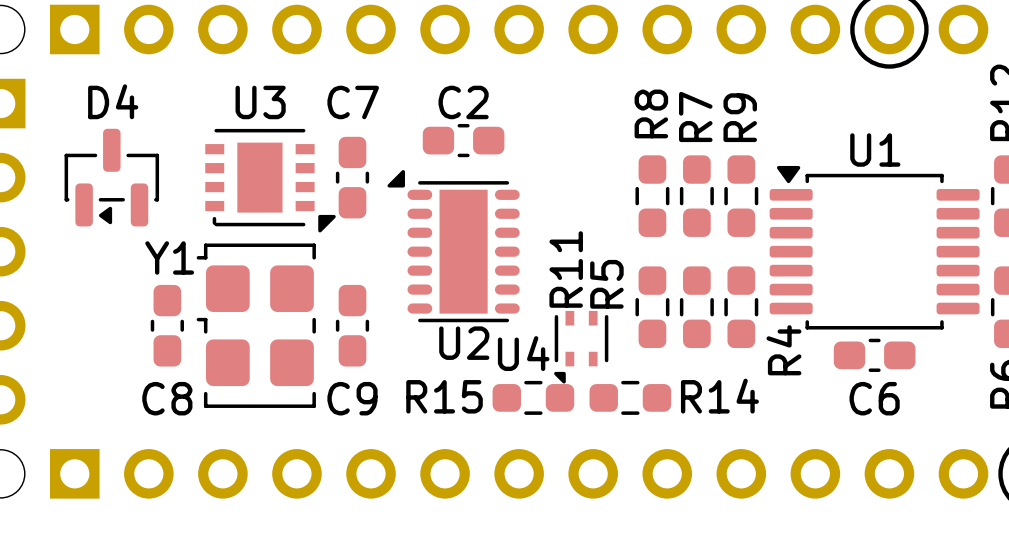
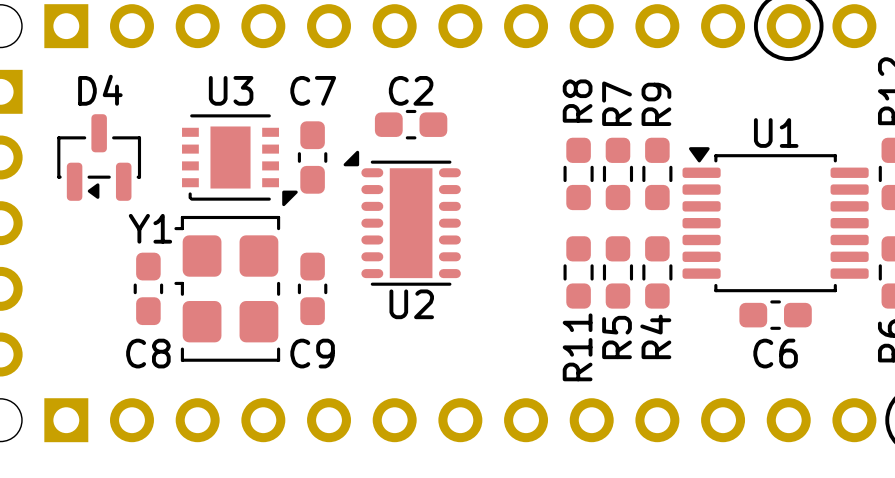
R11 name position: R11 (566, 269) -> R11 (577, 347)
R5 name position: R5 (606, 284) -> R5 (617, 337)
U4: (581, 347) -> none
R4 name position: R4 (783, 350) -> R4 (655, 336)
R15: (533, 397) -> none
R14: (630, 397) -> none

